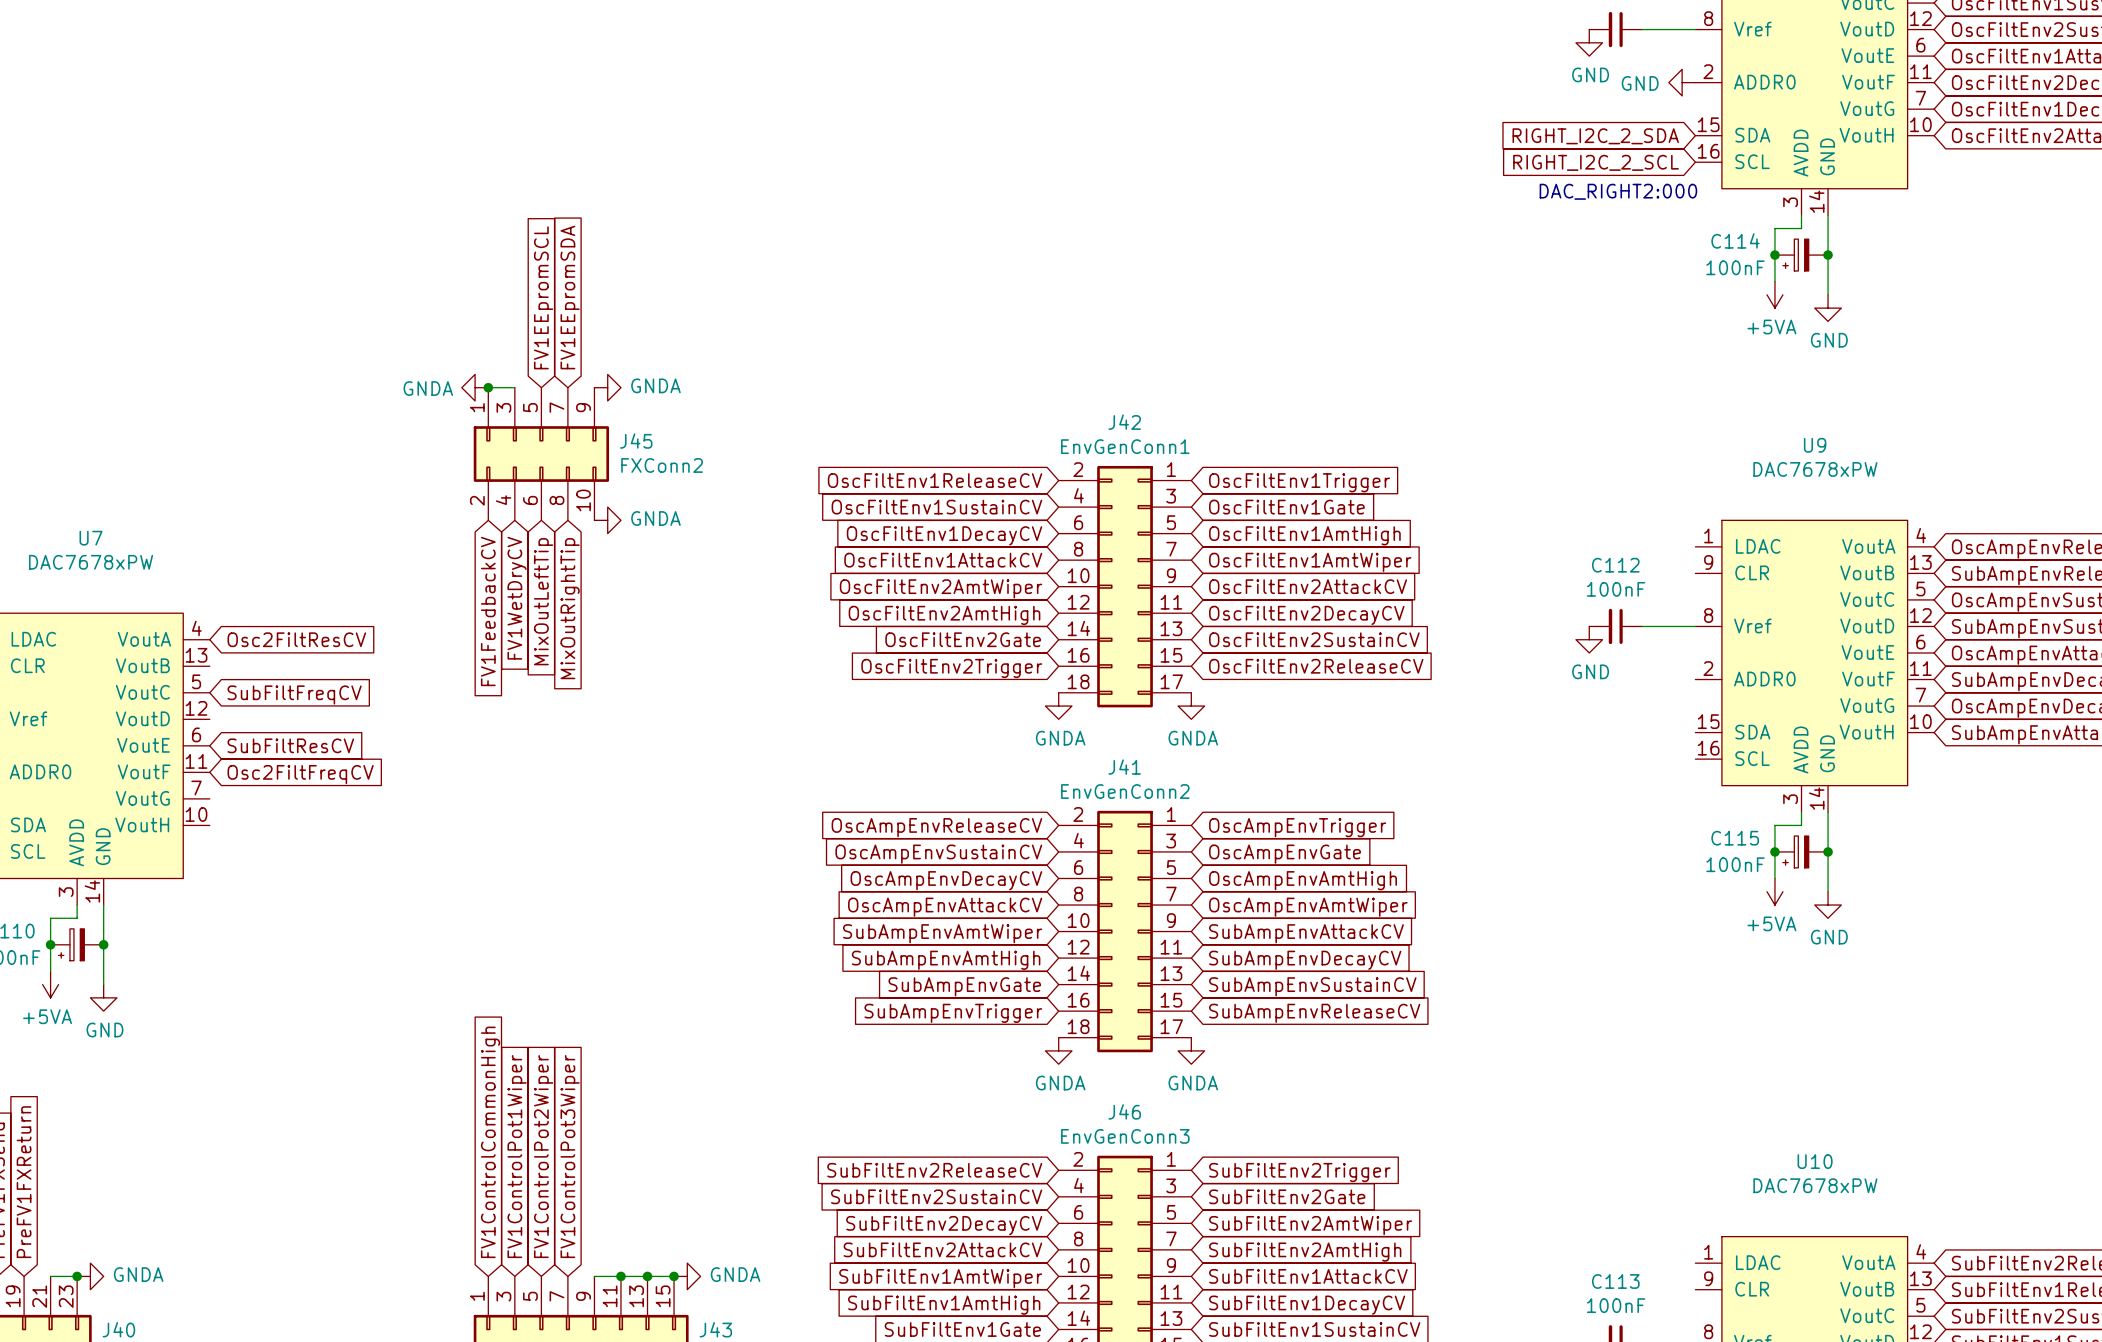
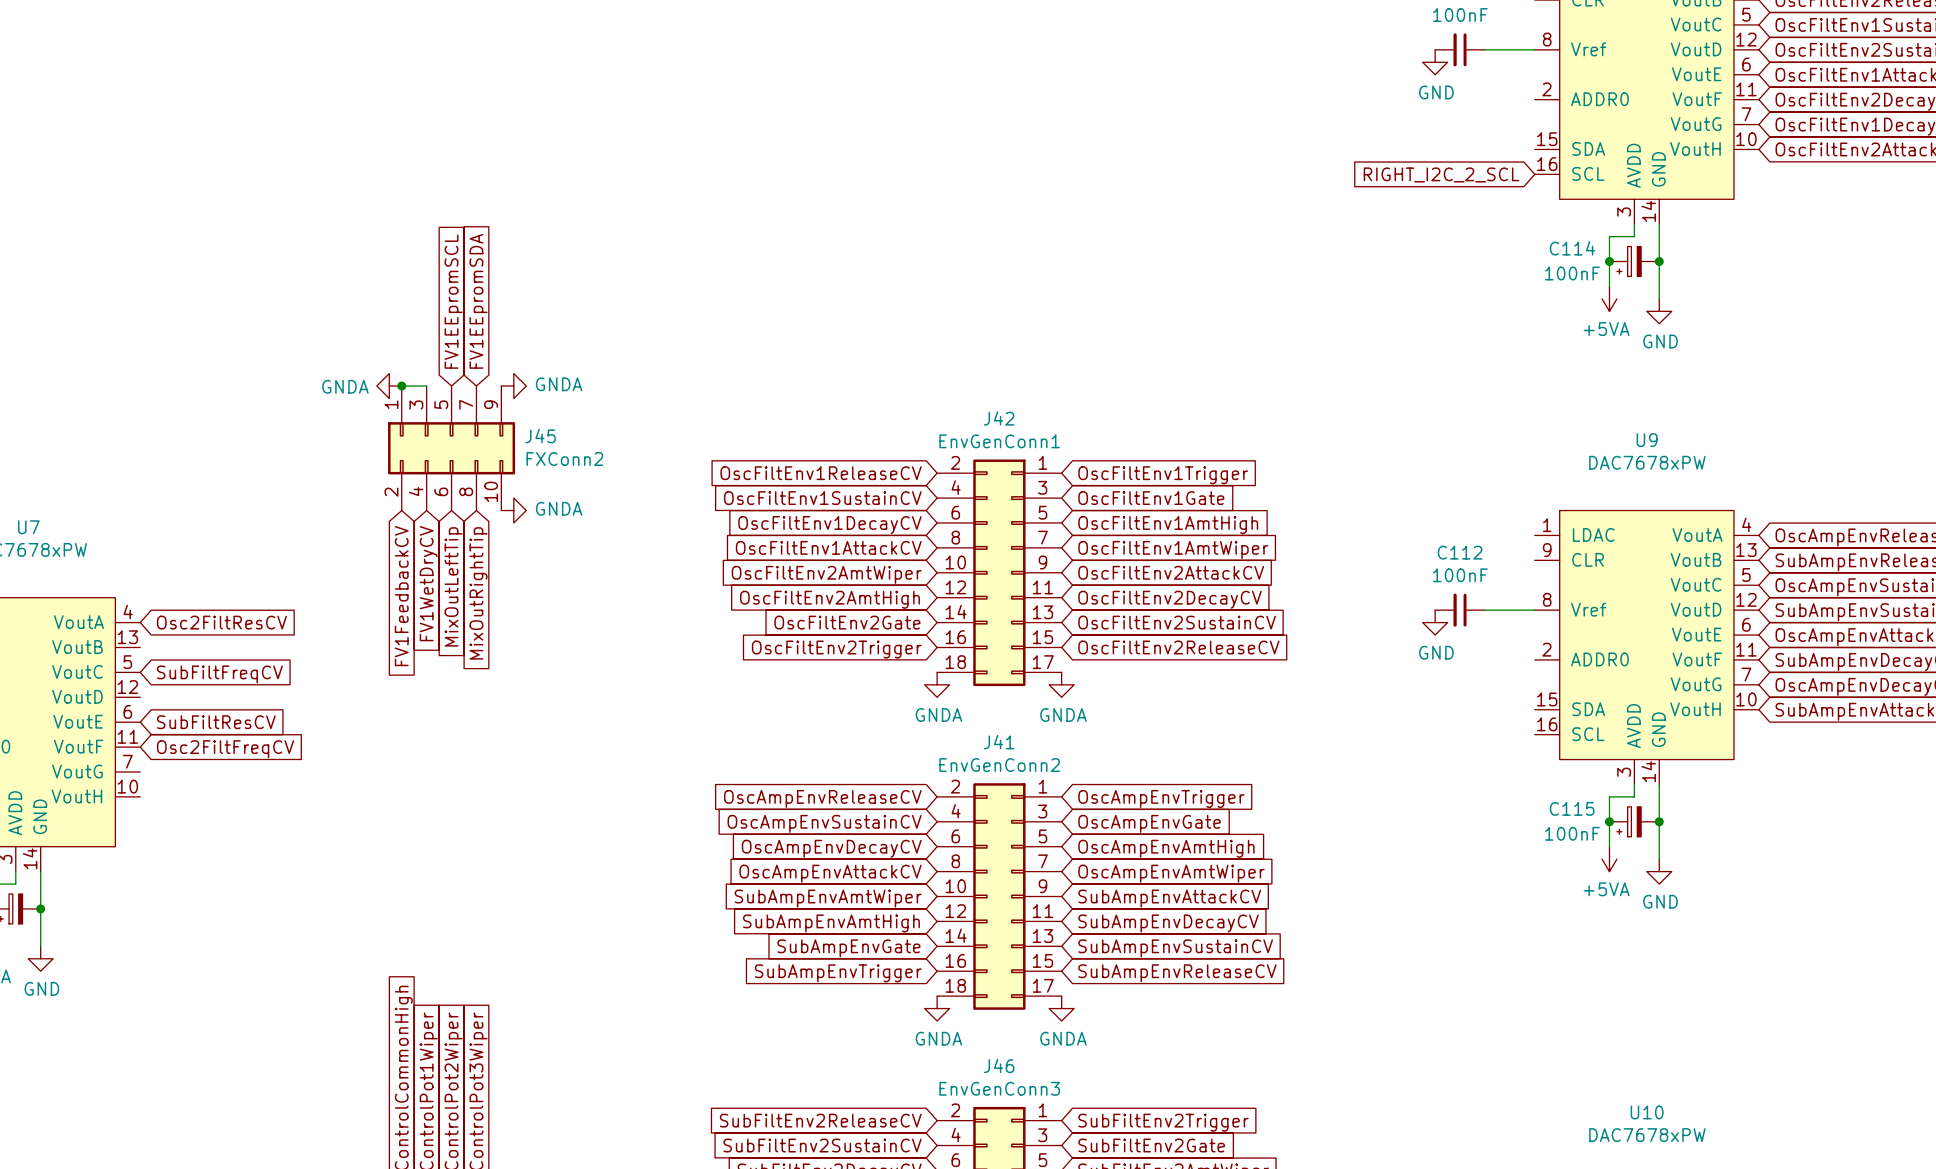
power symbol: GND (1682, 82) -> none
global label: RIGHT_I2C_2_SDA (1595, 136) -> none
text: DAC_RIGHT2:000 (1618, 191) -> none

